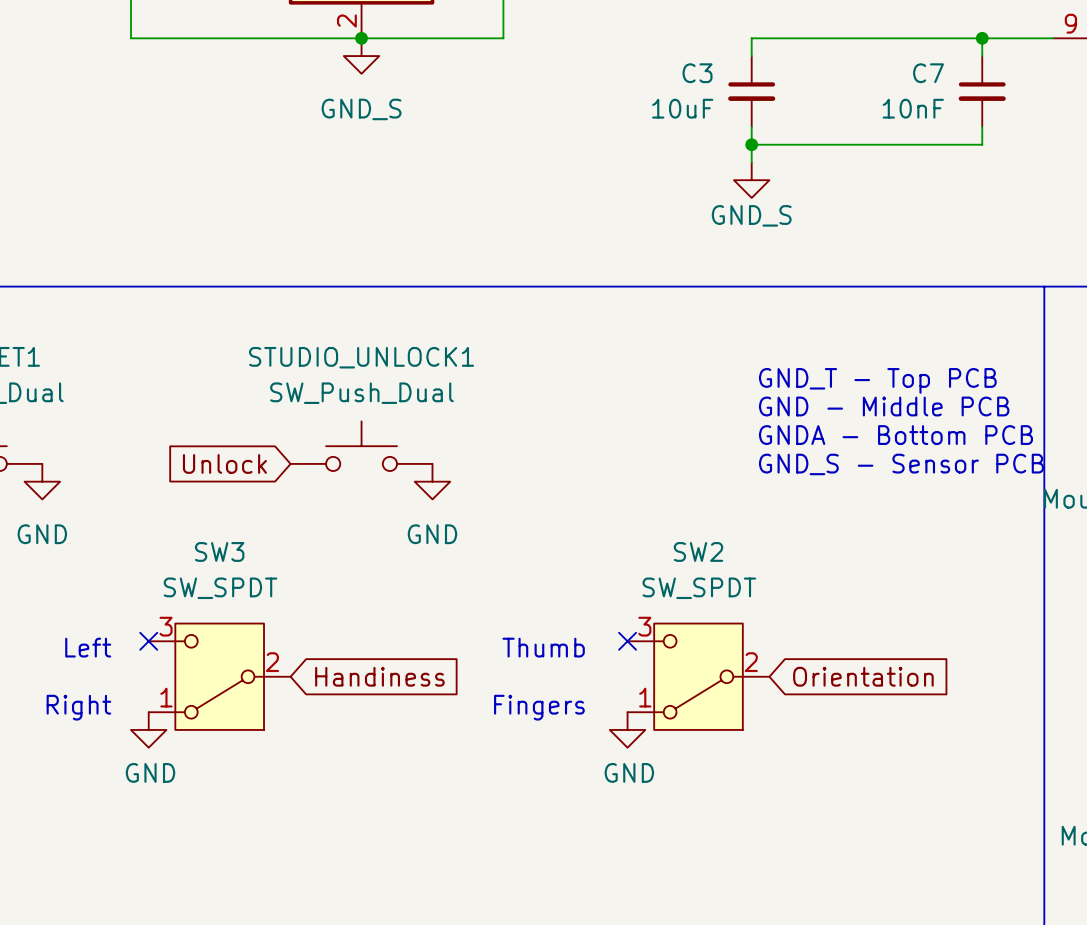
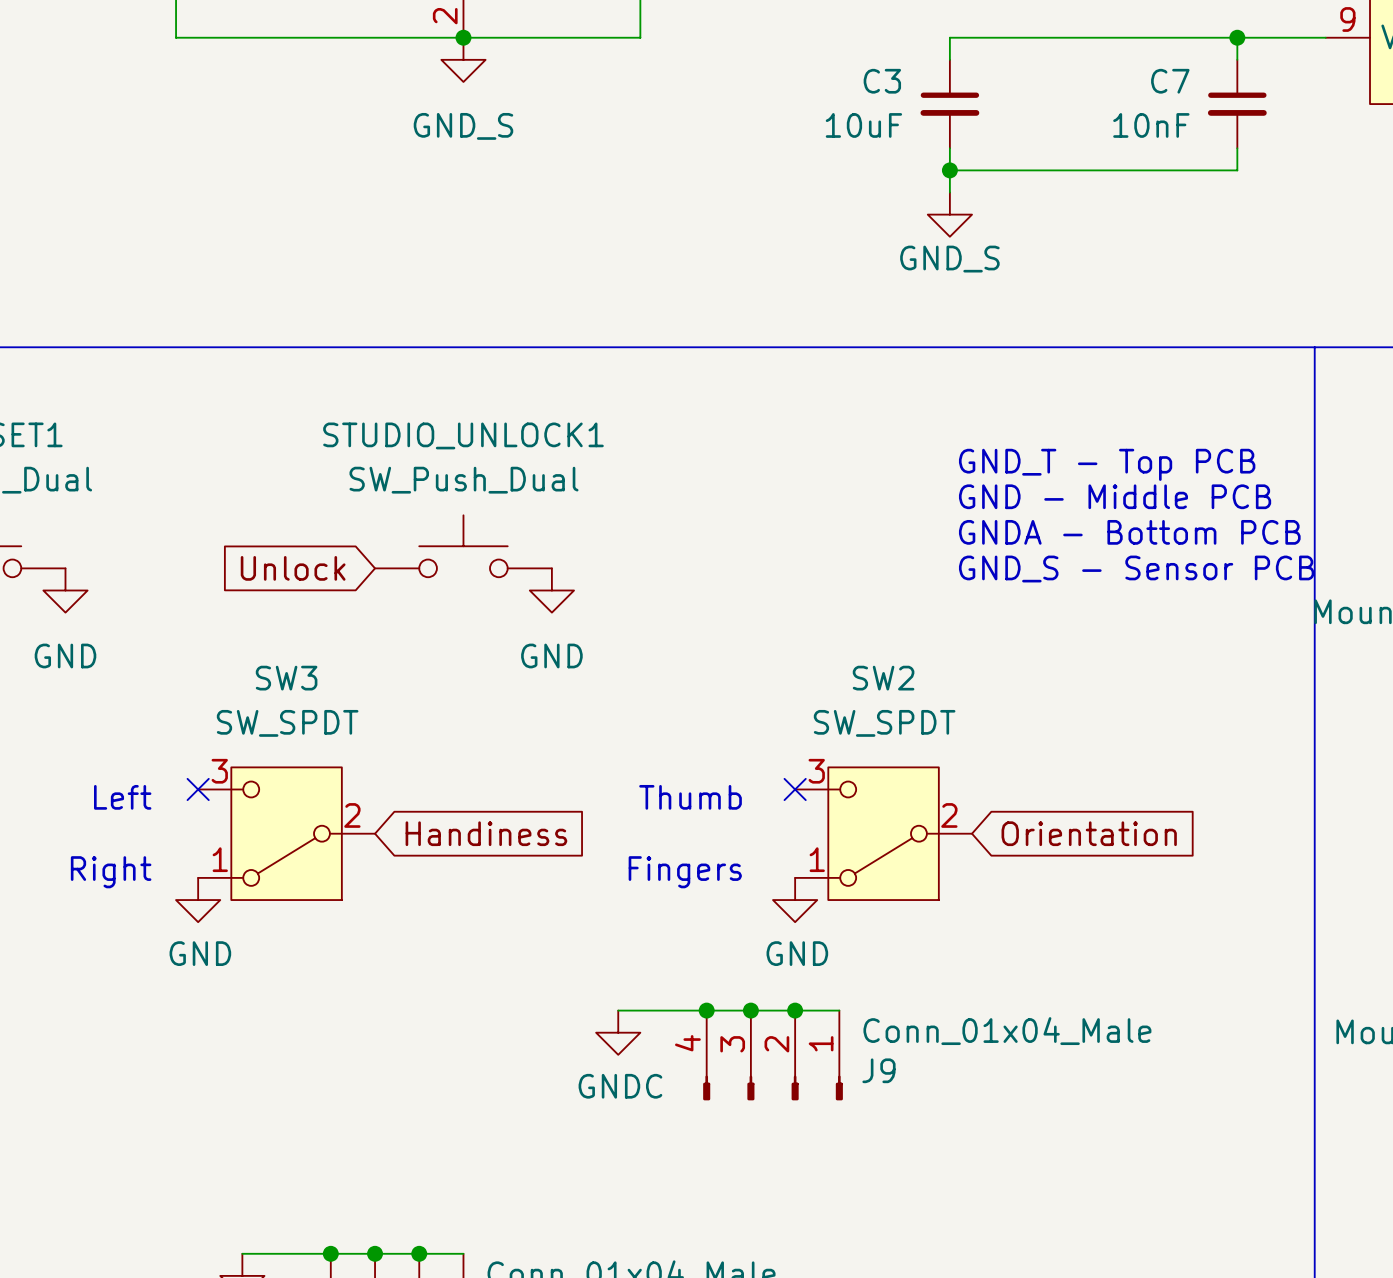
wire: none -> (618, 1010) (839, 1010)
junction: none -> (706, 1010)
junction: none -> (750, 1010)
junction: none -> (795, 1010)
power symbol: none -> GNDC (618, 1032)
J9: none -> Conn_01x04_Male (773, 1055)

